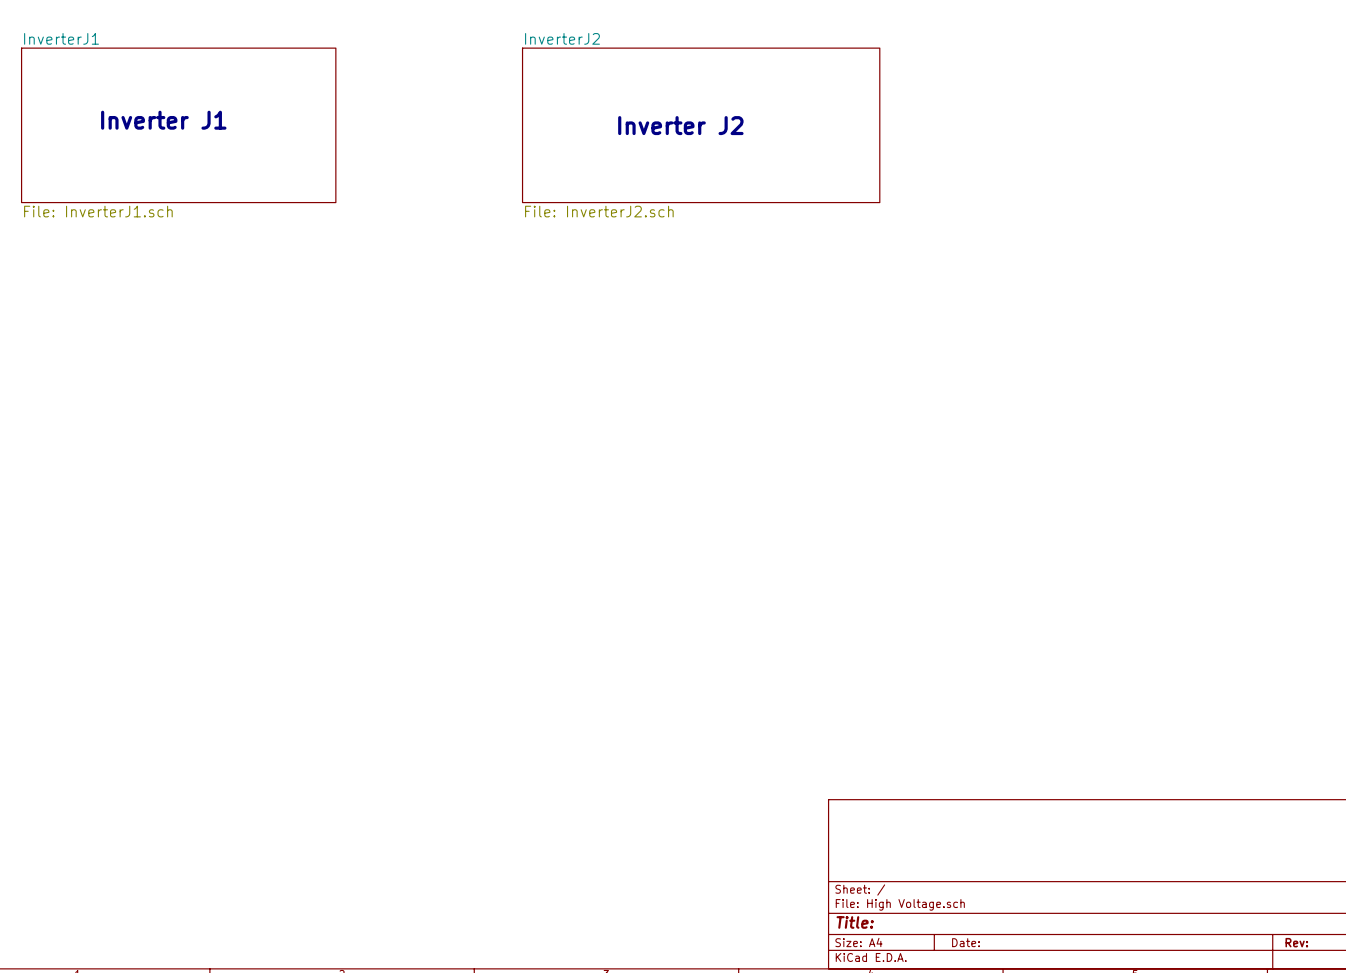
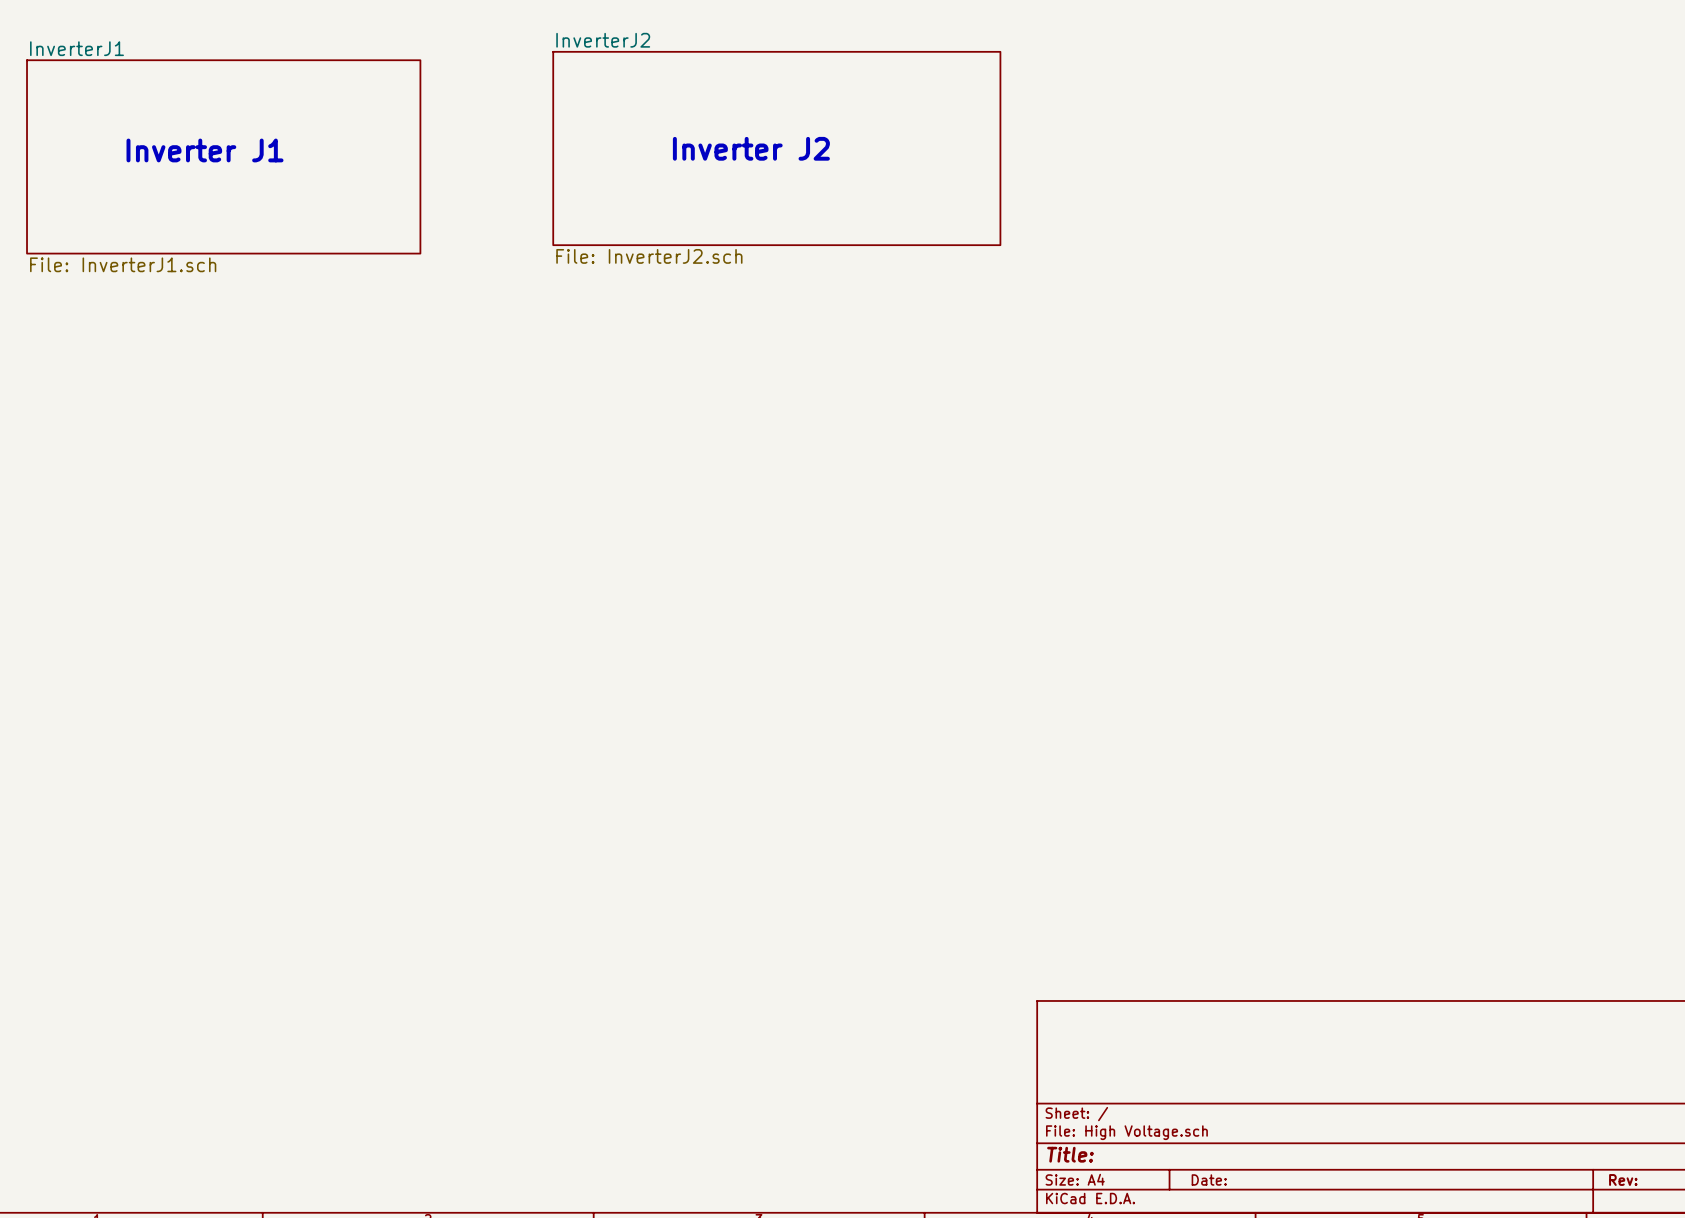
text position: Inverter J2 (680, 125) -> Inverter J2 (751, 148)
sheet InverterJ2 position: (701, 125) -> (776, 148)

